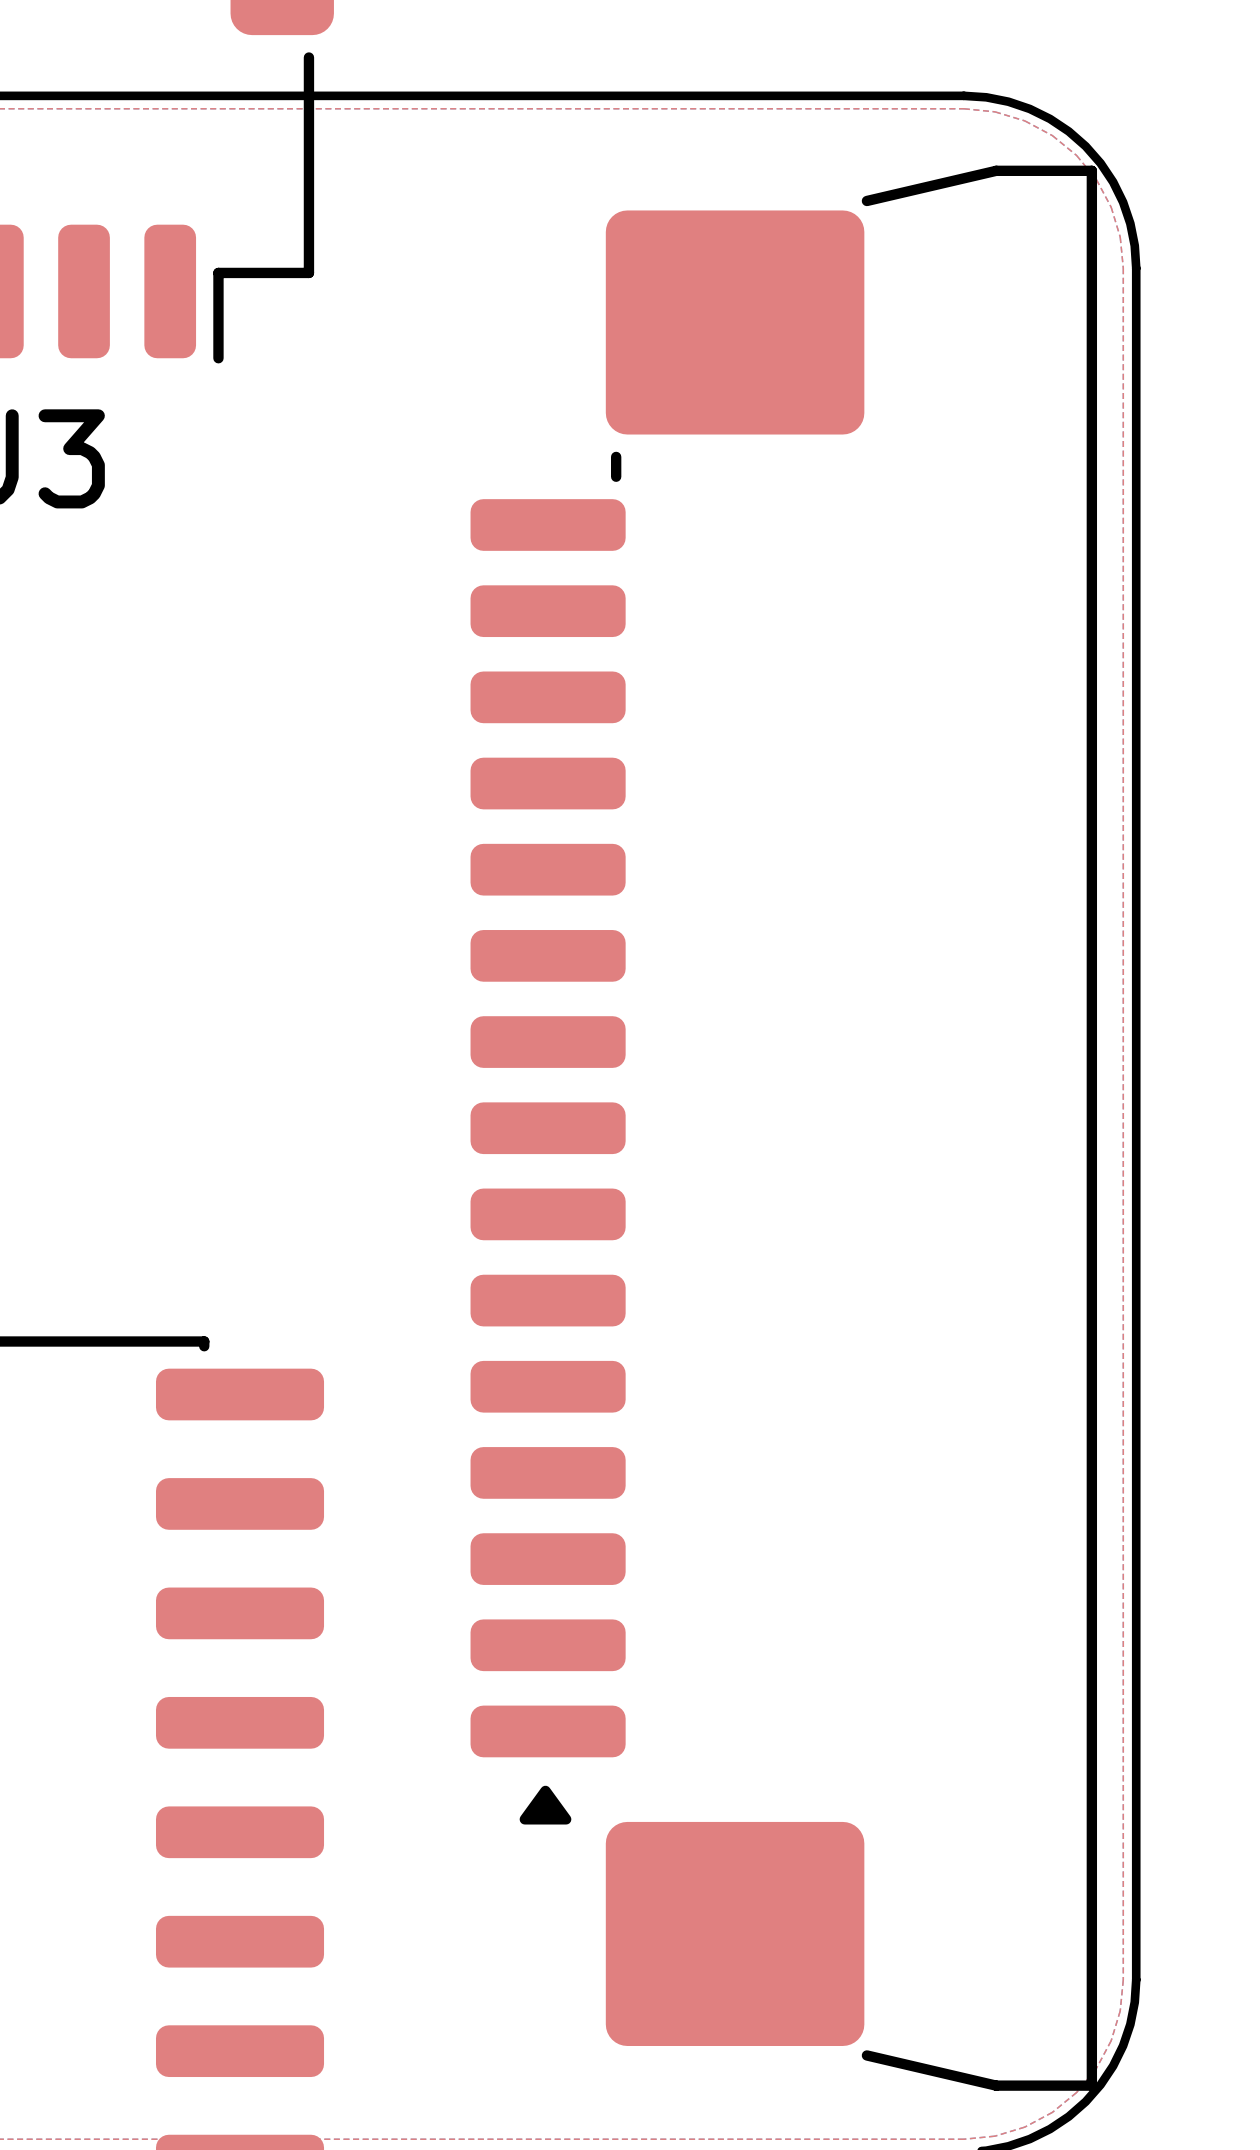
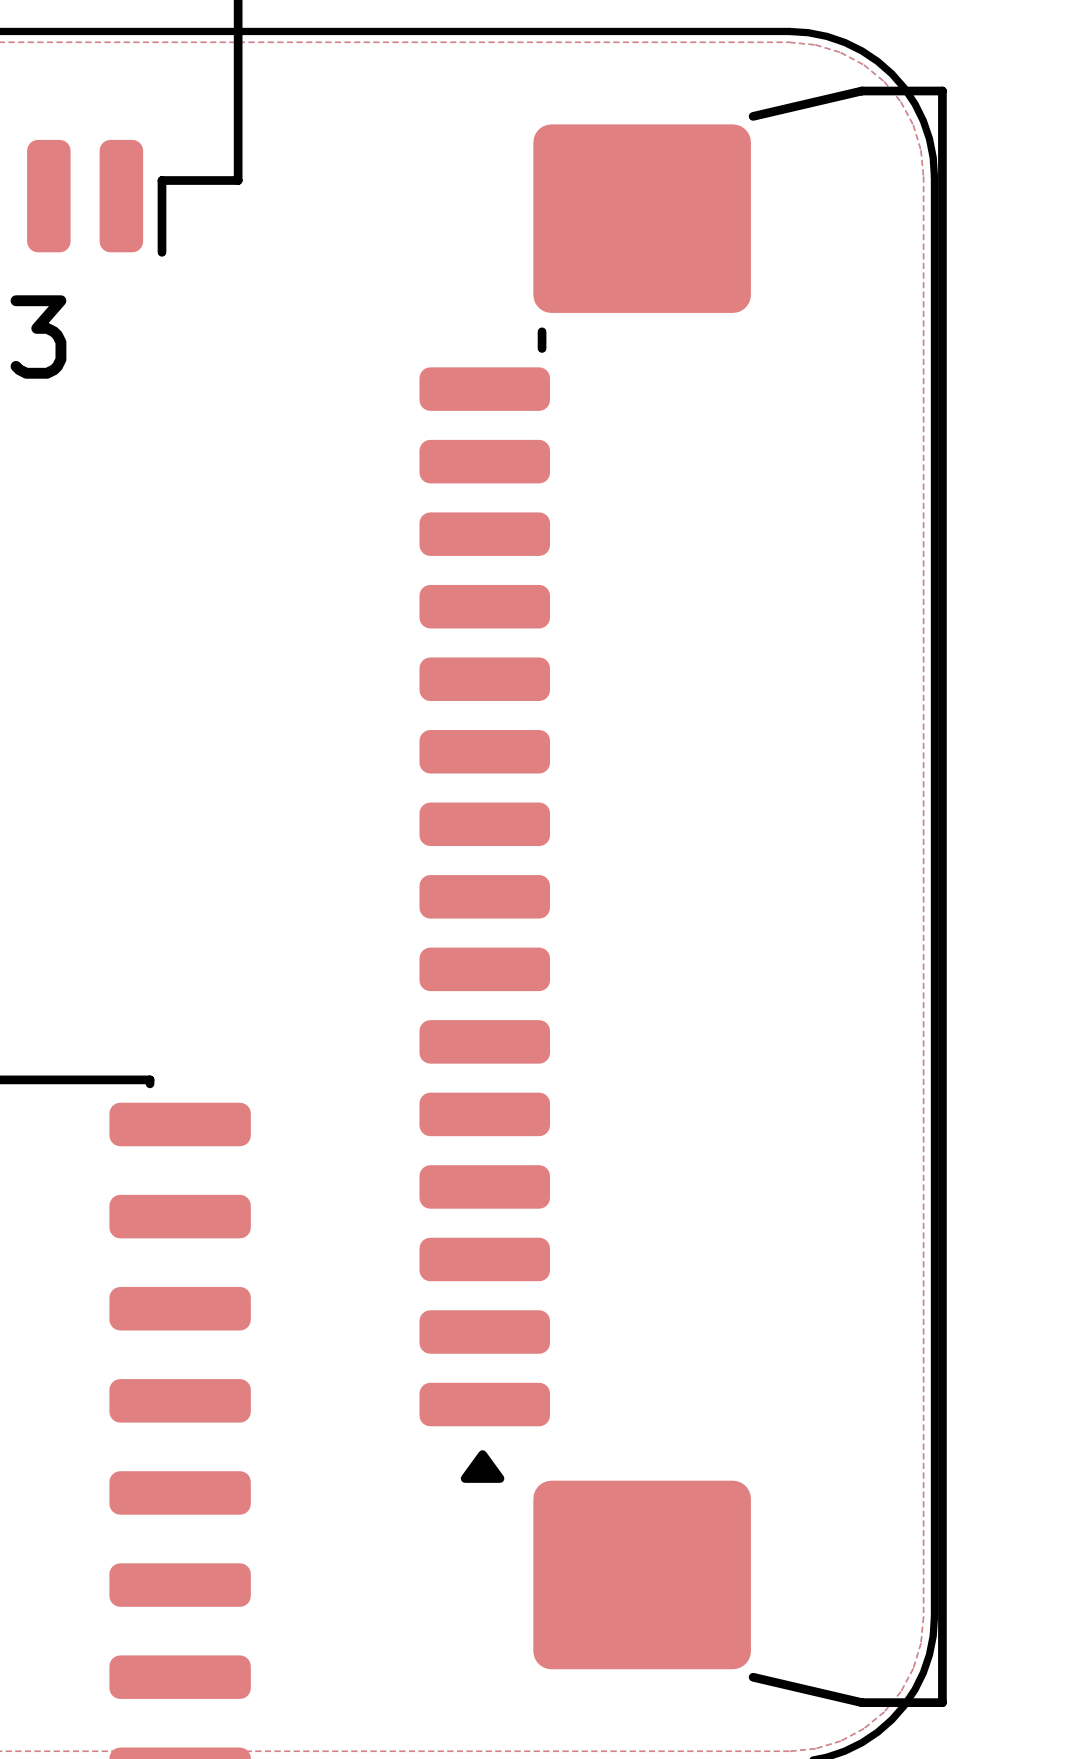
part position: (783, 1128) -> (683, 896)

